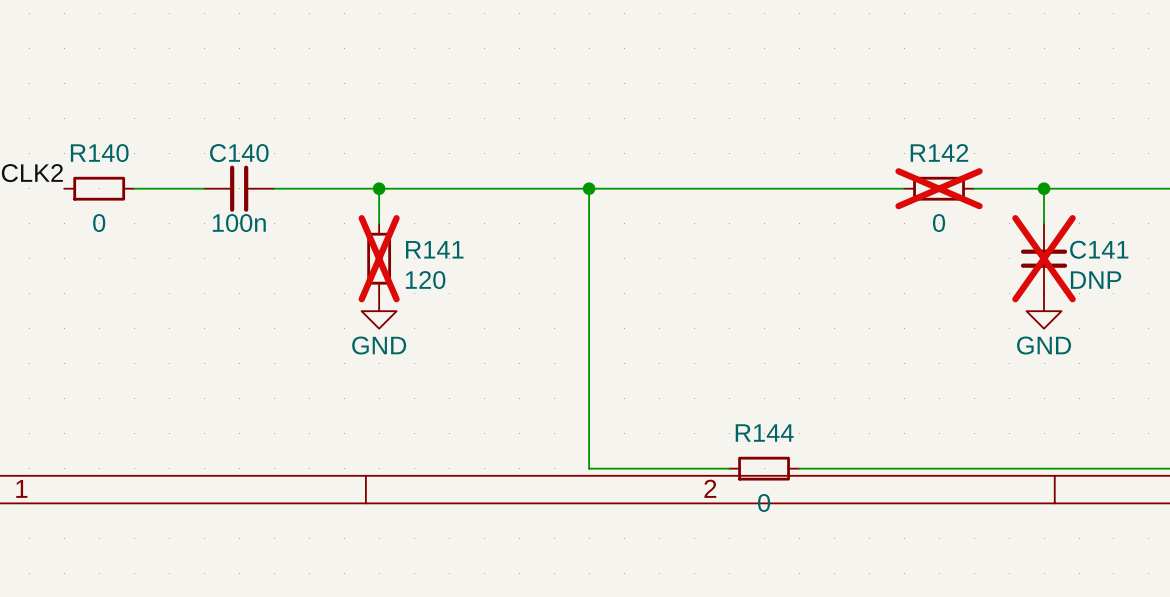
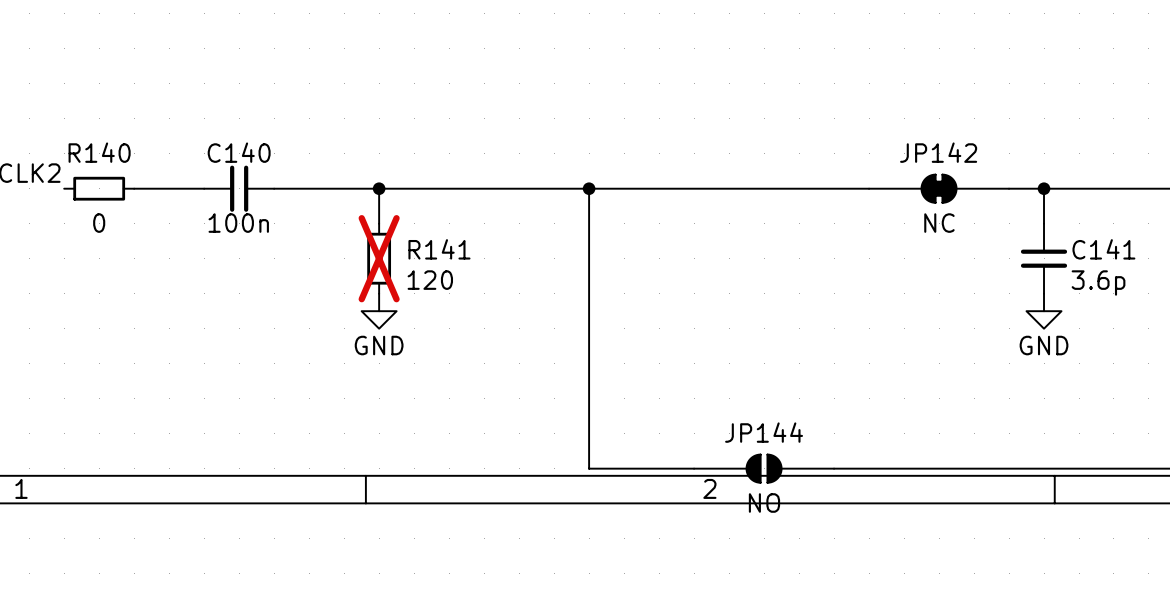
R142: 0 (939, 188) -> none
JP142: none -> NC (939, 188)
C141 do-not-place cross: (1044, 258) -> none
C141 value: DNP (1096, 280) -> 3.6p (1098, 283)
R144: 0 (764, 468) -> none
JP144: none -> NO (764, 468)

